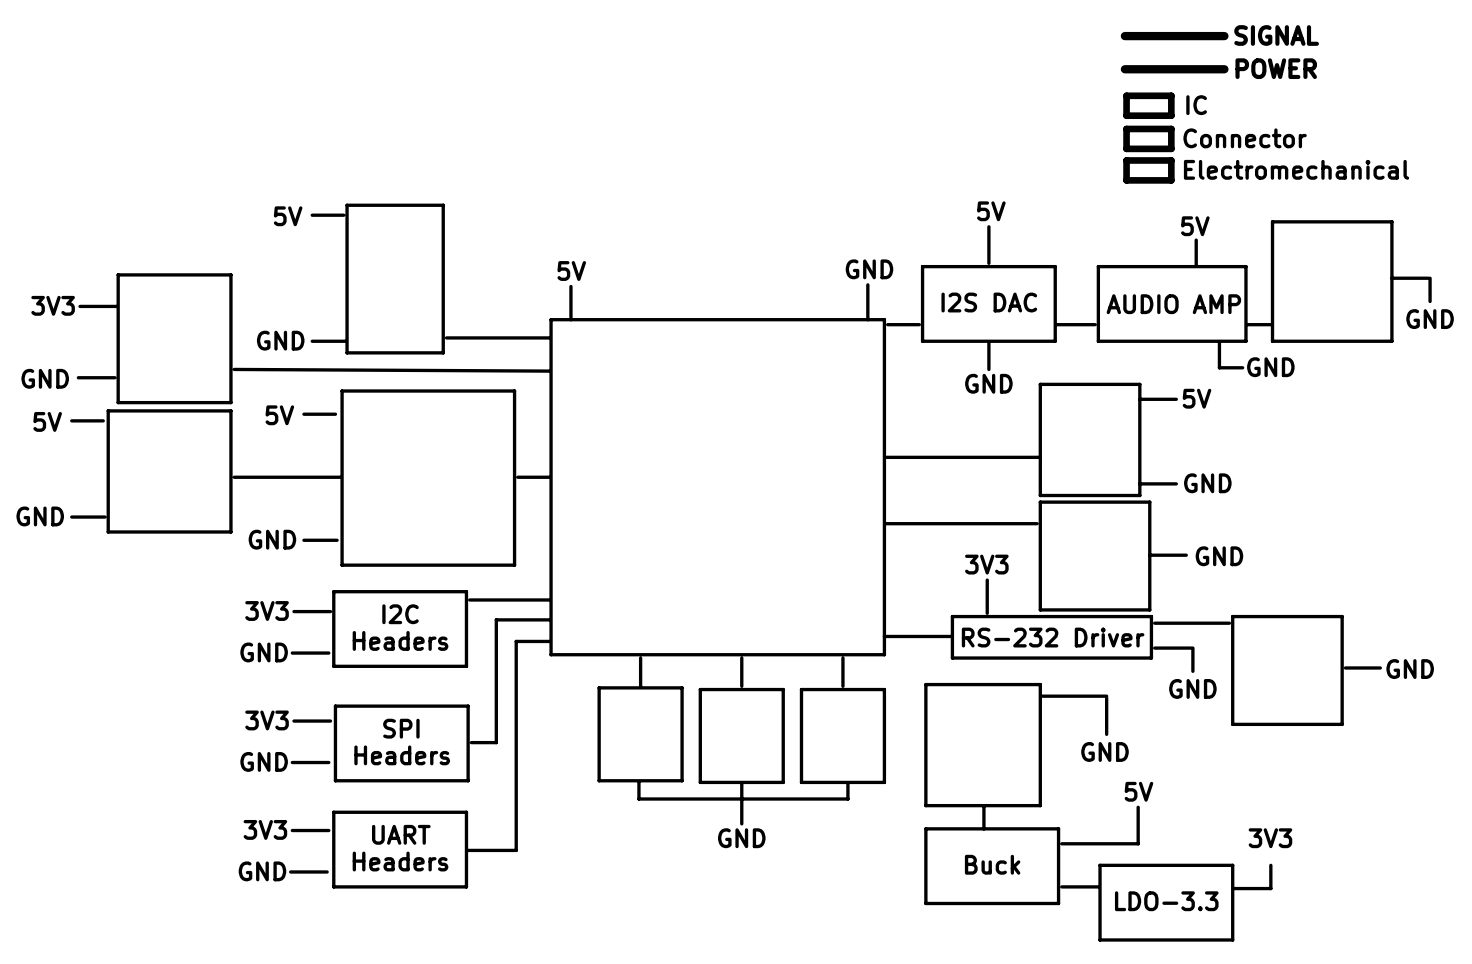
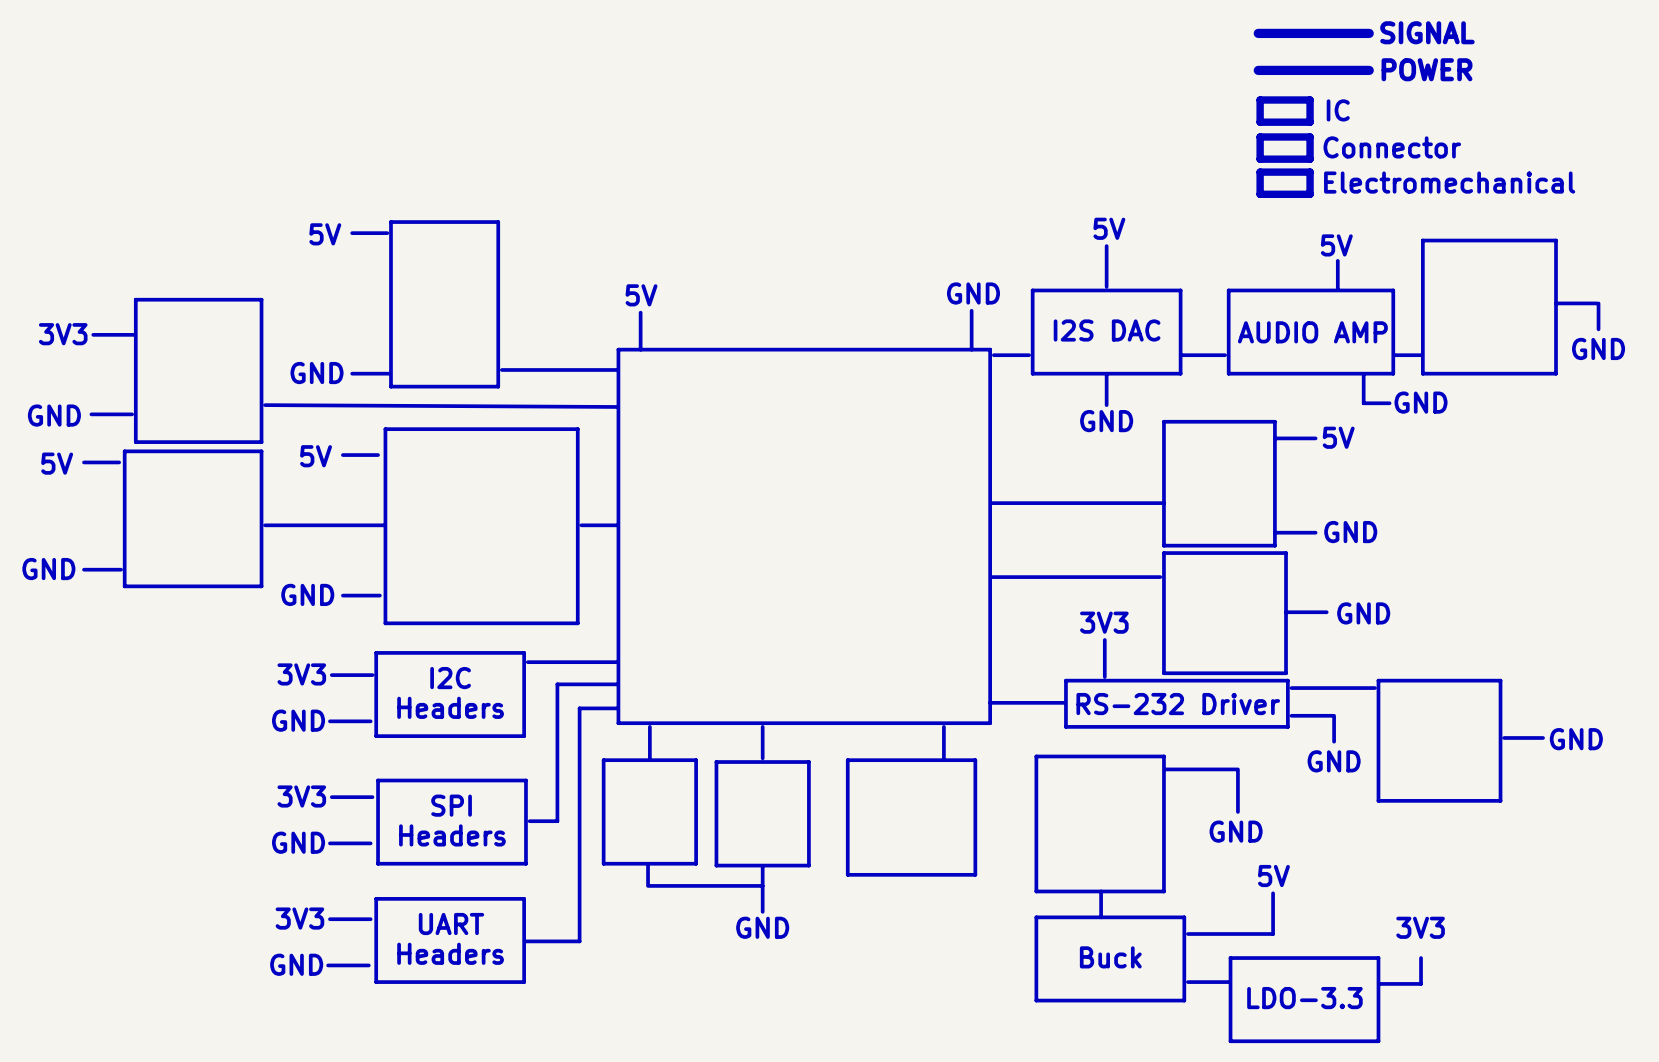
line: (640, 658) (640, 686) -> (649, 726) (649, 758)
line: (741, 658) (741, 686) -> (762, 726) (762, 758)
line: (599, 687) (599, 780) -> (672, 760) (603, 760) (603, 863) (672, 863)
line: (620, 687) (682, 687) (682, 780) (620, 780) -> (696, 760) (696, 863)
line: (700, 689) (700, 782) -> (784, 762) (716, 762) (716, 865) (784, 865)
line: (721, 689) (783, 689) (783, 782) (721, 782) -> (808, 762) (808, 865)
line: (801, 689) (884, 689) (884, 782) (801, 782) (801, 689) -> (847, 760) (847, 874) (975, 874) (975, 760) (847, 760)
line: none -> (648, 865) (648, 884)
line: (638, 782) (638, 799) (847, 799) (847, 784) -> none
line: (741, 784) (741, 823) -> (762, 867) (762, 911)
line: none -> (648, 885) (762, 885)
text position: GND (741, 838) -> GND (762, 927)

